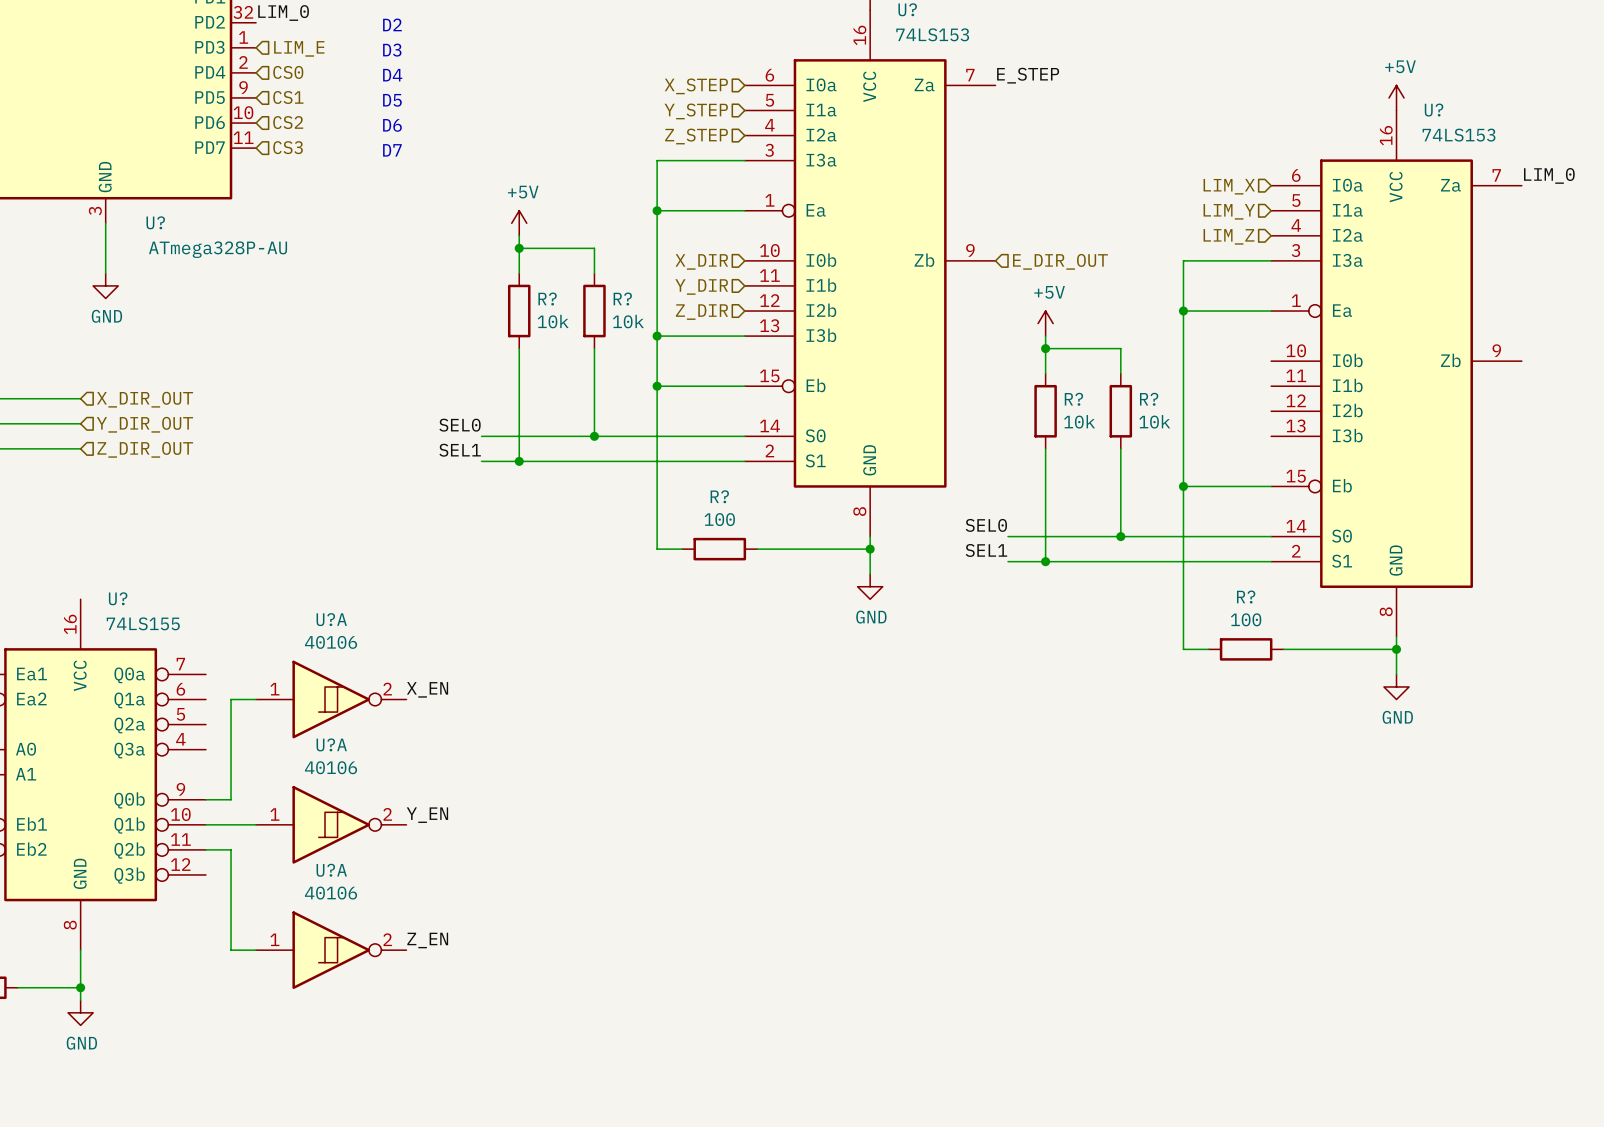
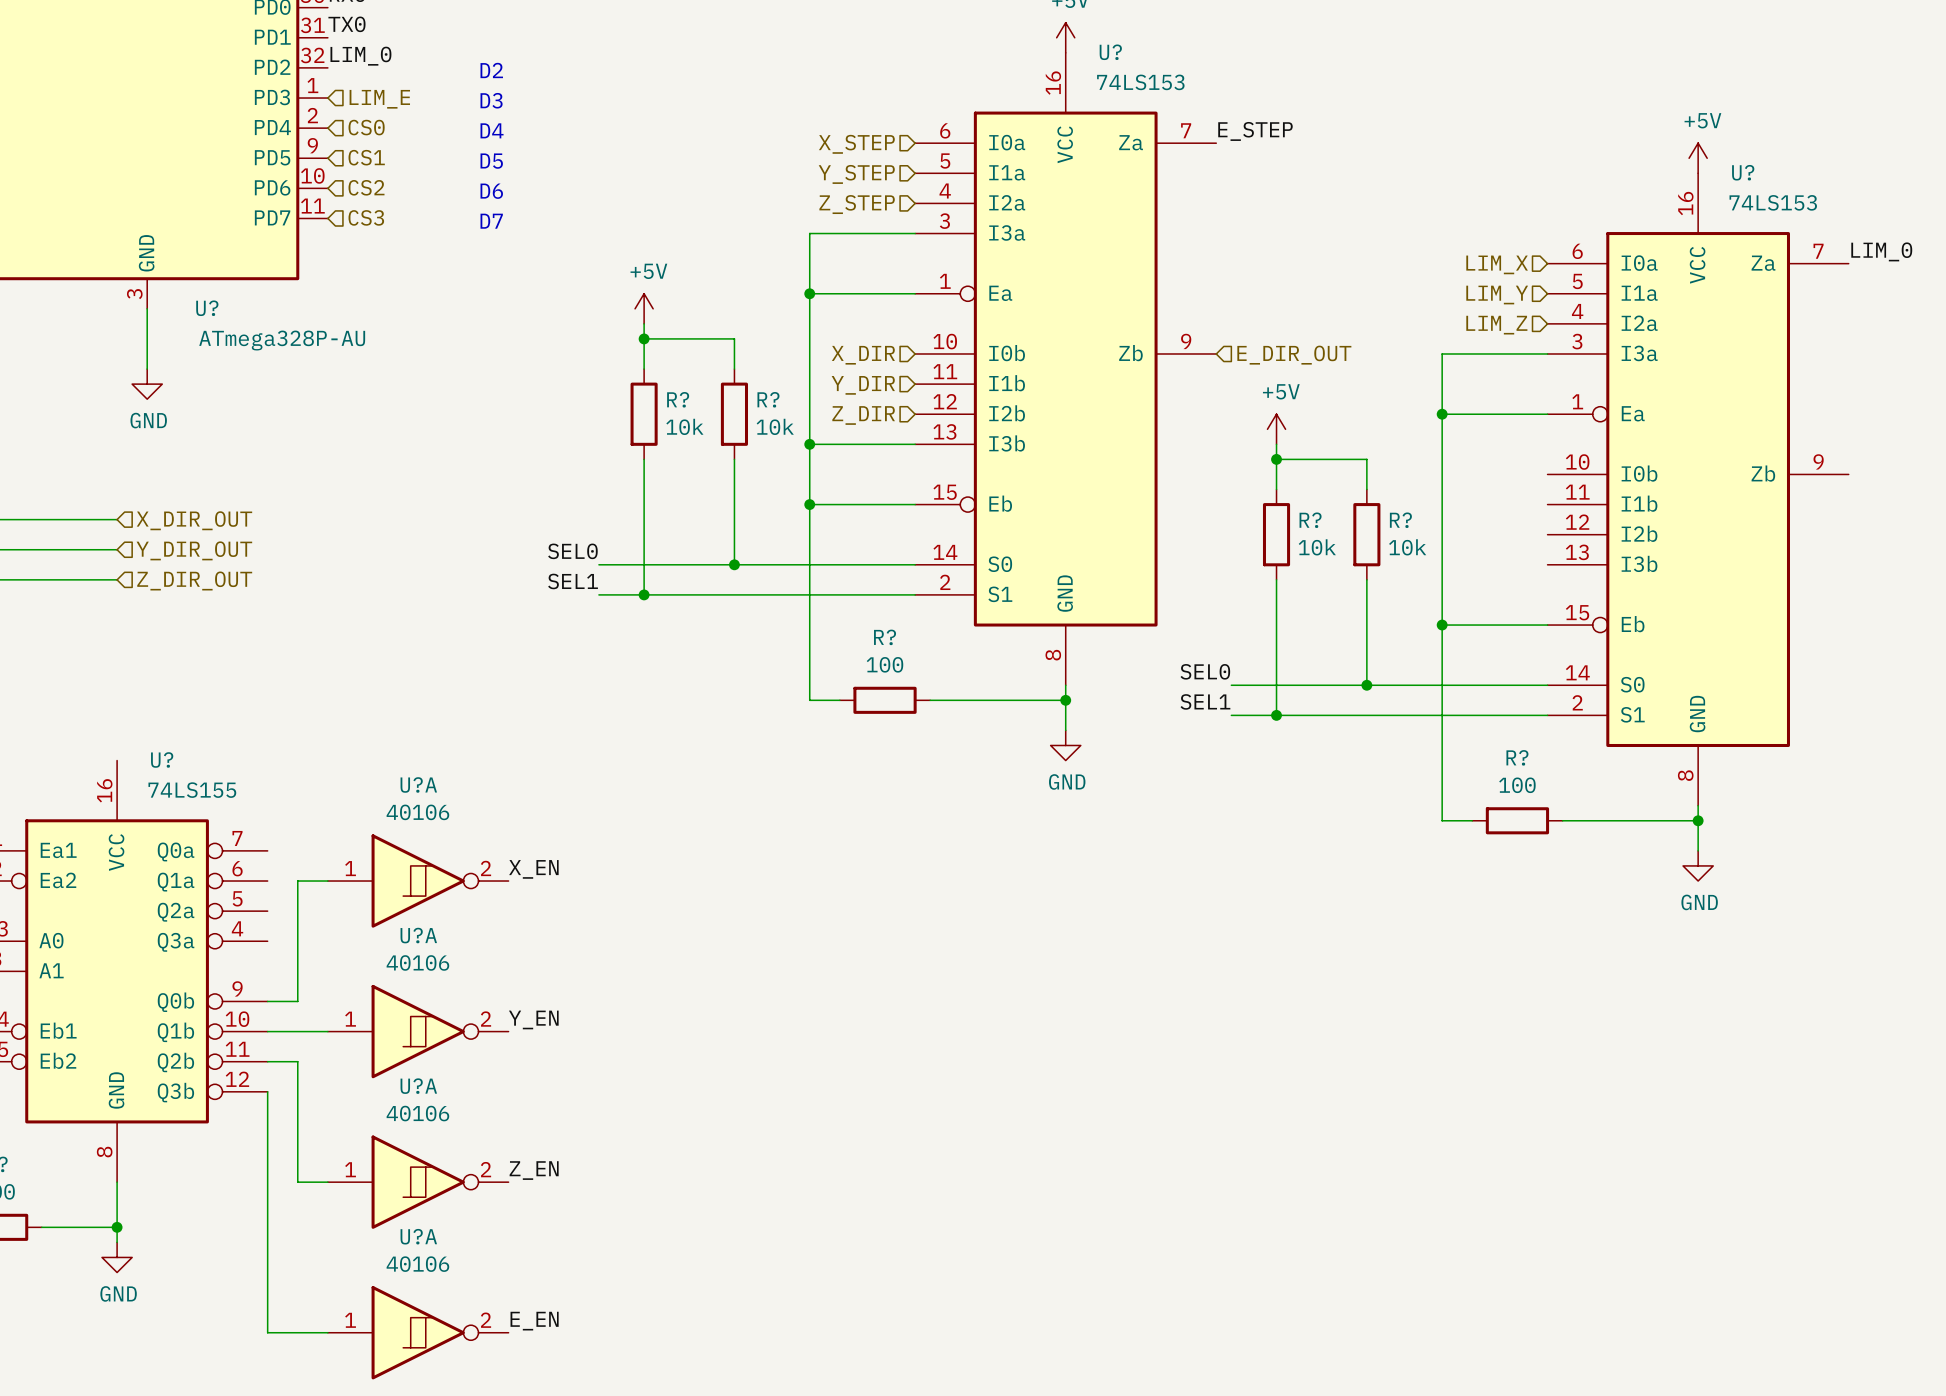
wire: none -> (267, 1091) (267, 1332) (327, 1332)
label: none -> E_EN (534, 1321)
U?A: none -> 40106 (418, 1332)

